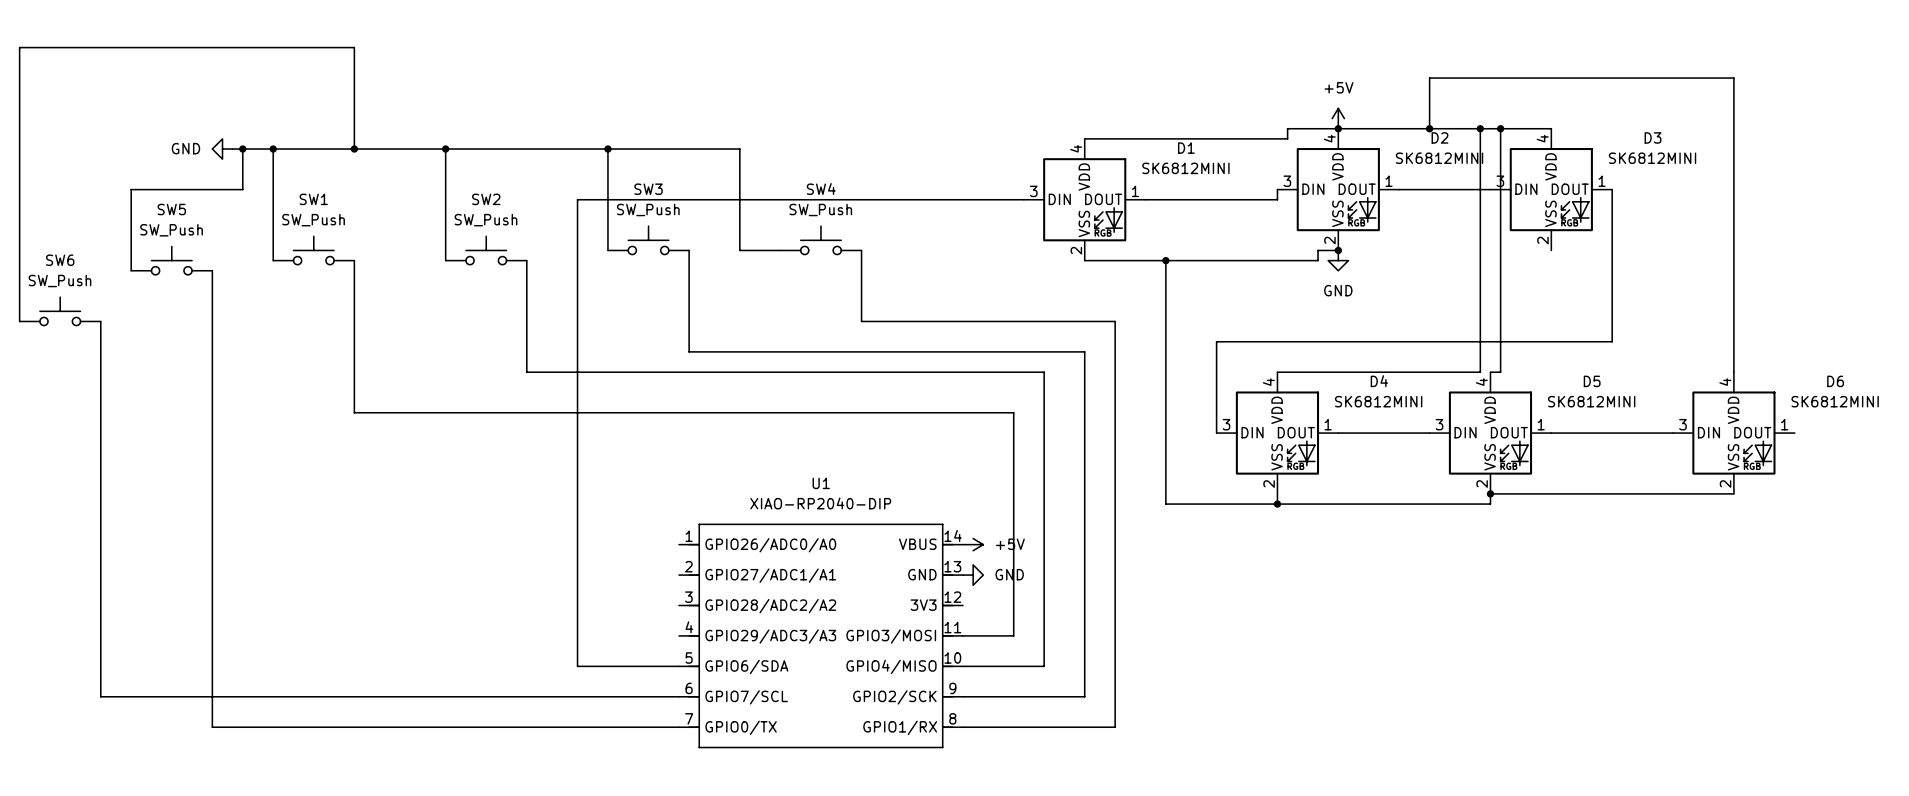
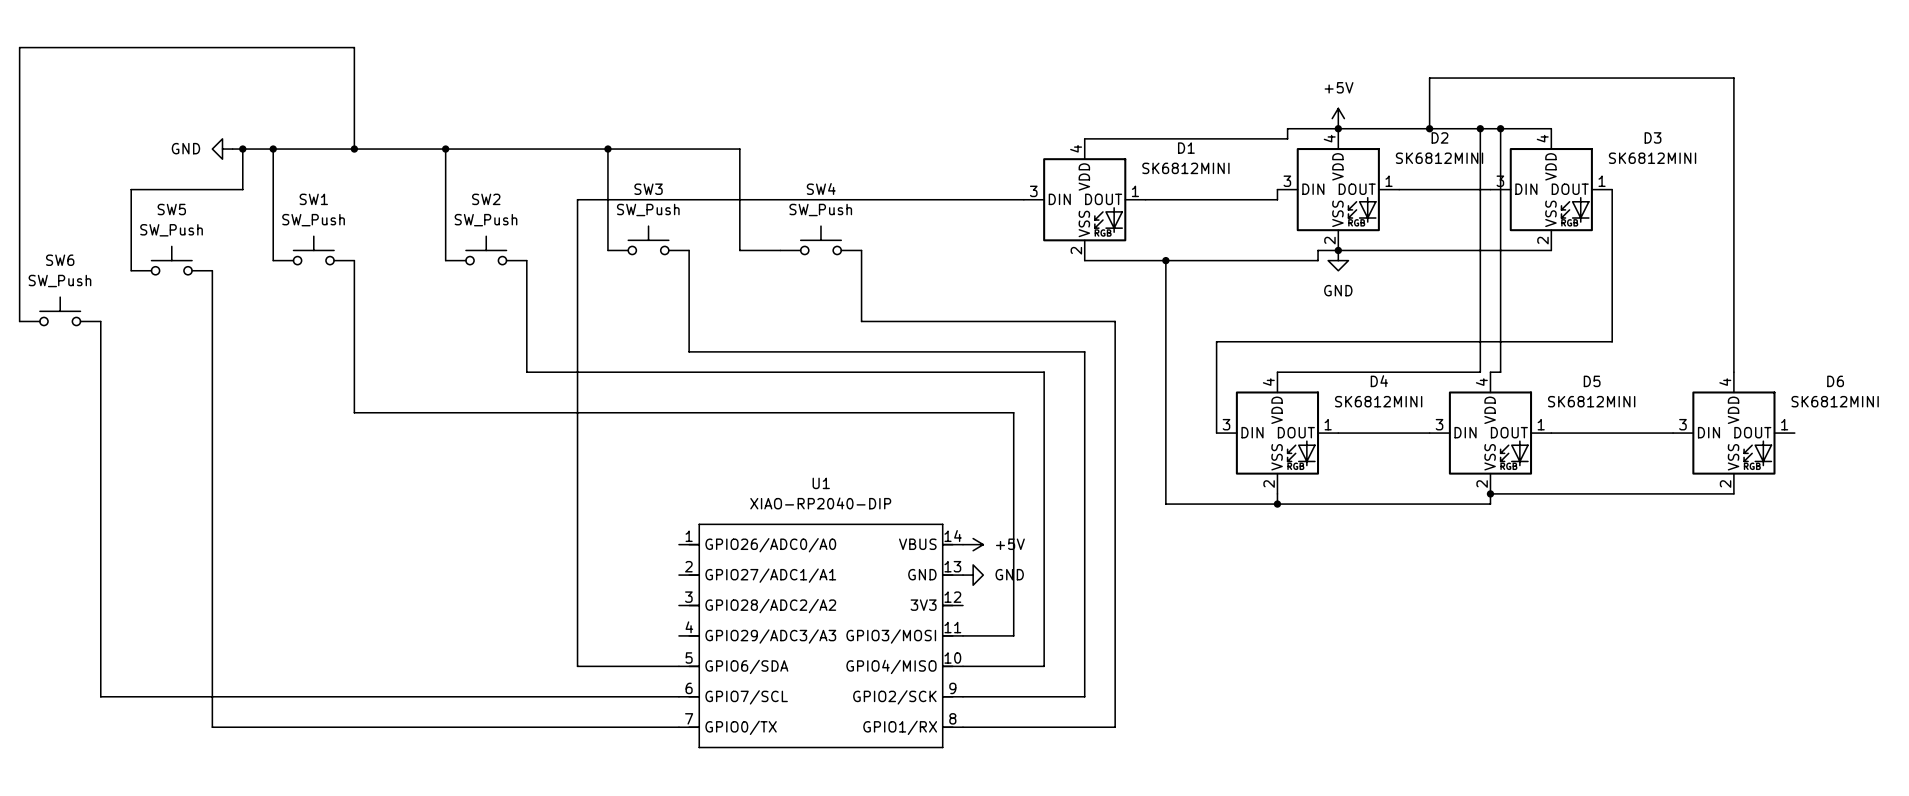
wire: none -> (1338, 250) (1551, 250)

